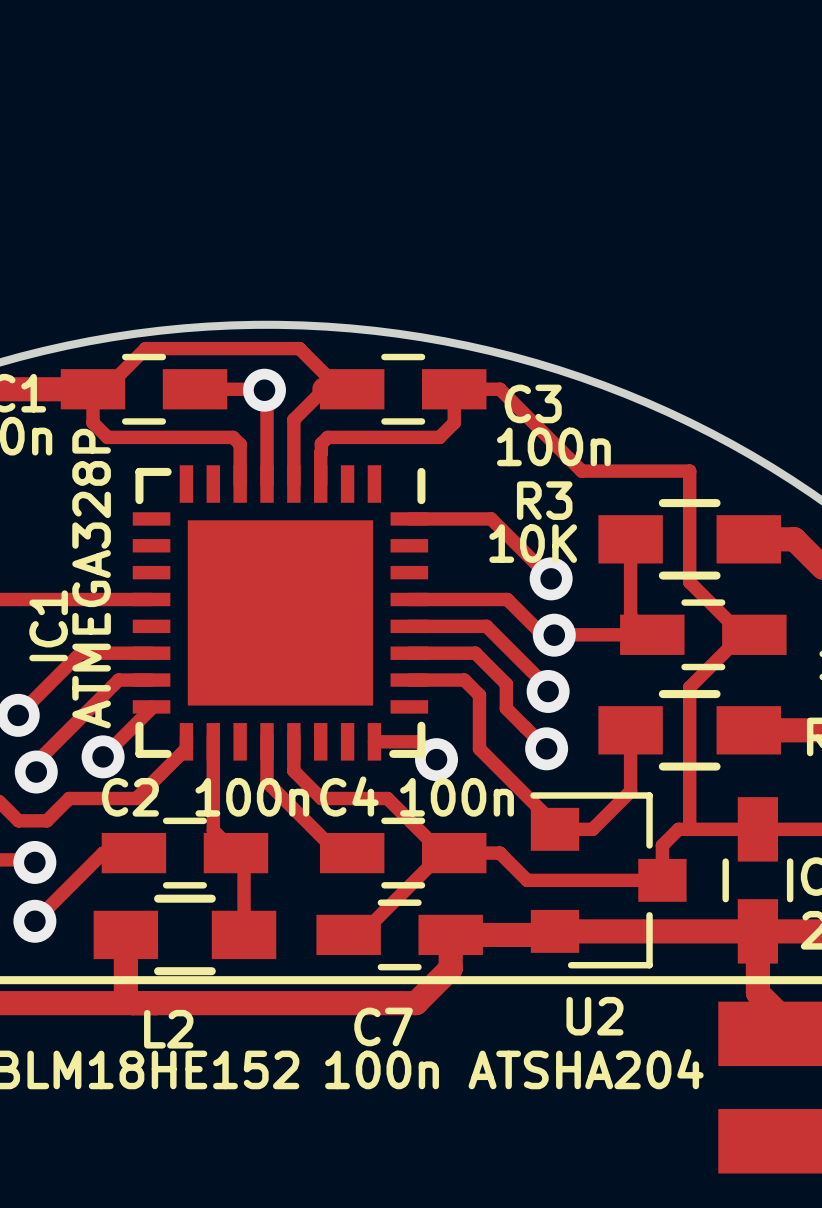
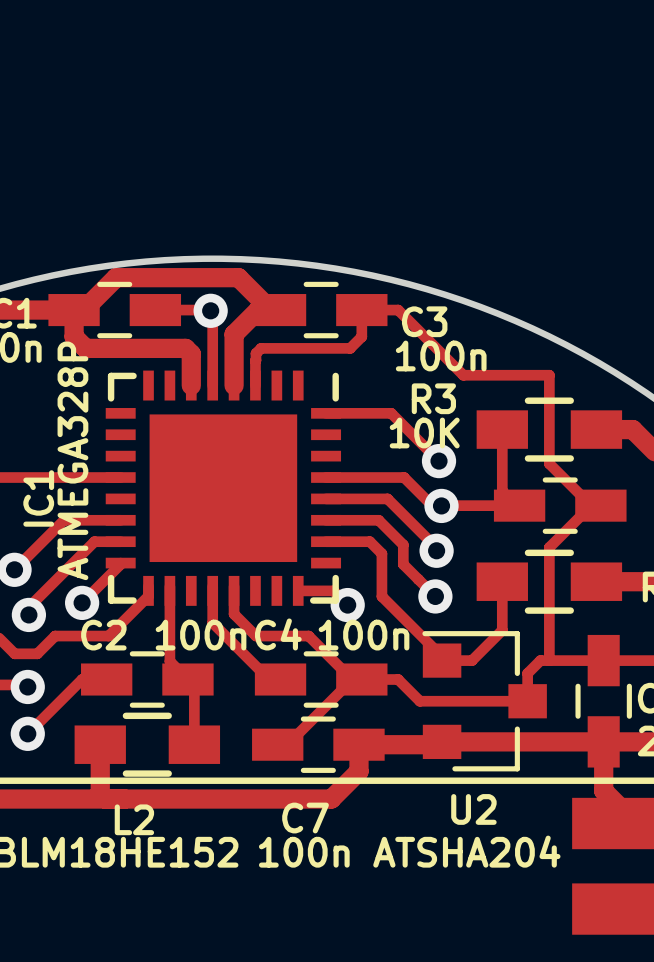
track width: thin (93, 389) (93, 422) (107, 437) (233, 437) (240, 444) (240, 484) -> thick (74, 310) (74, 336) (85, 348) (185, 348) (191, 354) (191, 385)
track width: thin (105, 389) (145, 348) (299, 348) (340, 389) -> thick (83, 310) (116, 277) (238, 277) (270, 310)
track width: thin (324, 389) (293, 419) (293, 484) -> thick (258, 310) (234, 334) (234, 385)

